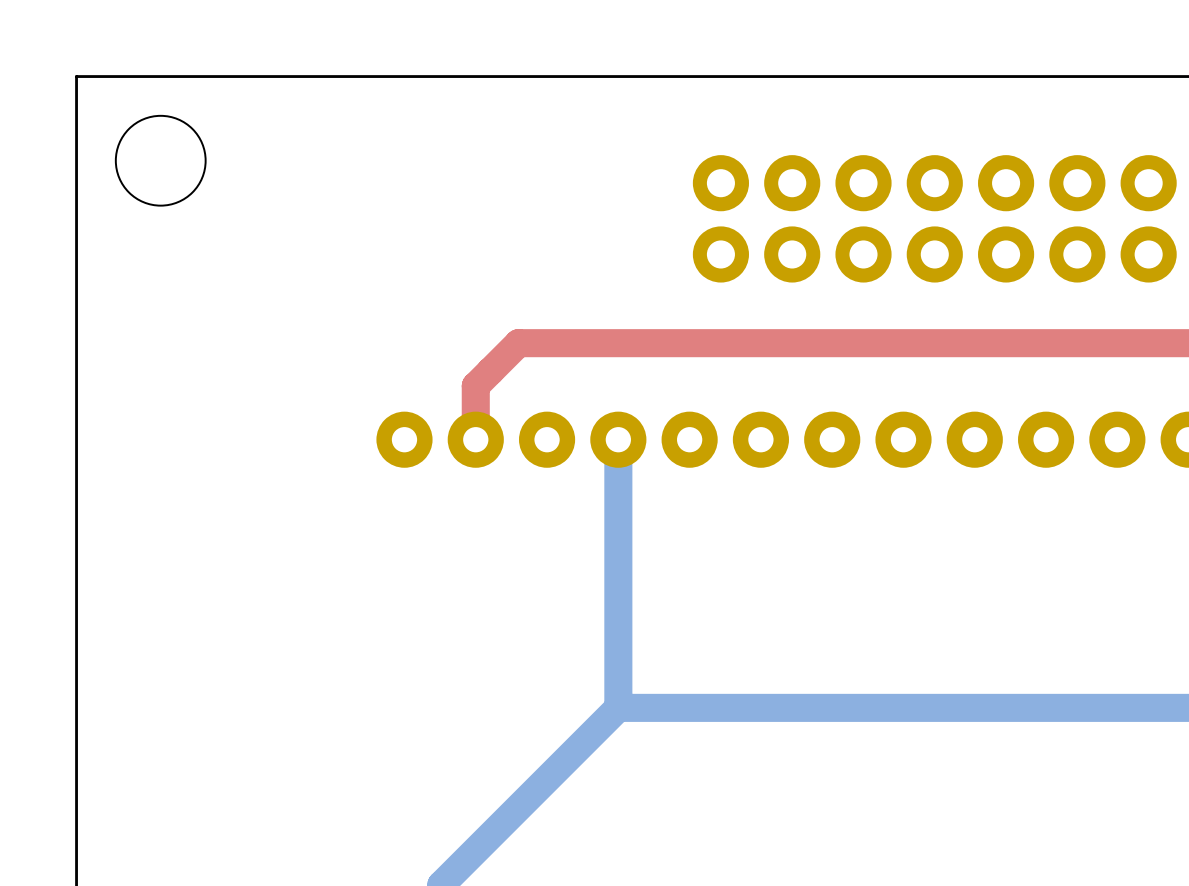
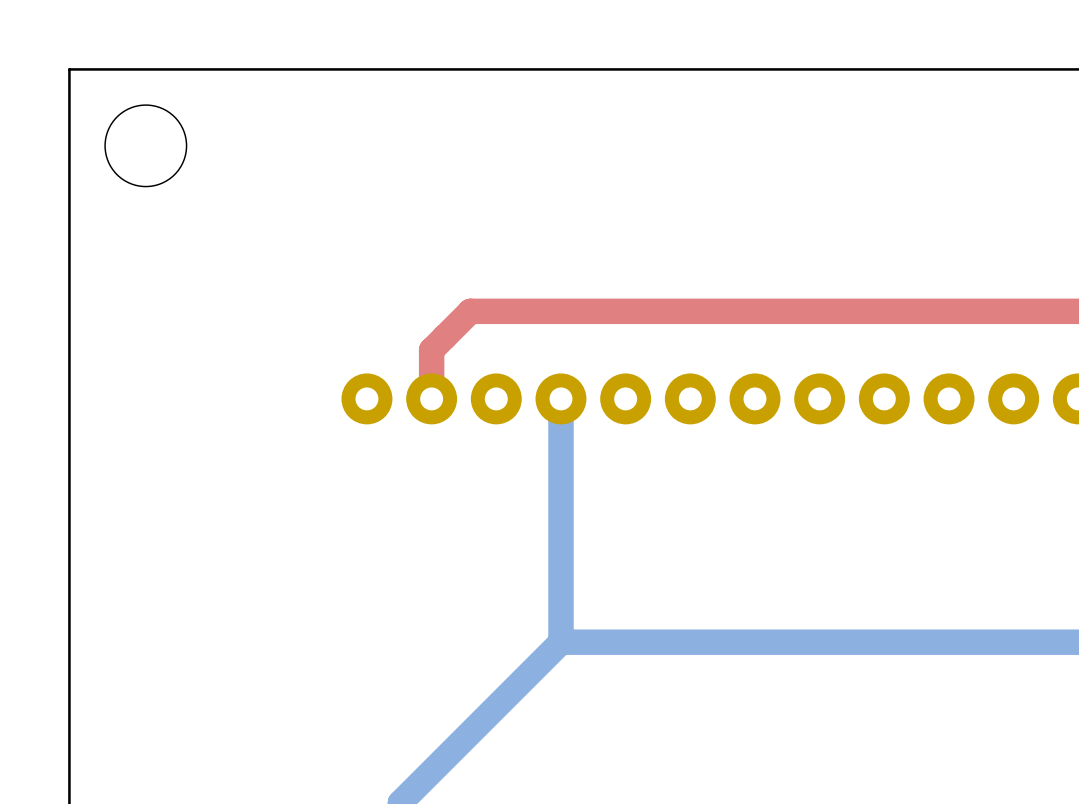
part: (720, 183) -> none
part: (792, 183) -> none
part: (863, 183) -> none
part: (934, 183) -> none
part: (1006, 183) -> none
part: (1077, 183) -> none
part: (1148, 183) -> none
part: (720, 254) -> none
part: (792, 254) -> none
part: (863, 254) -> none
part: (934, 254) -> none
part: (1006, 254) -> none
part: (1077, 254) -> none
part: (1148, 254) -> none

